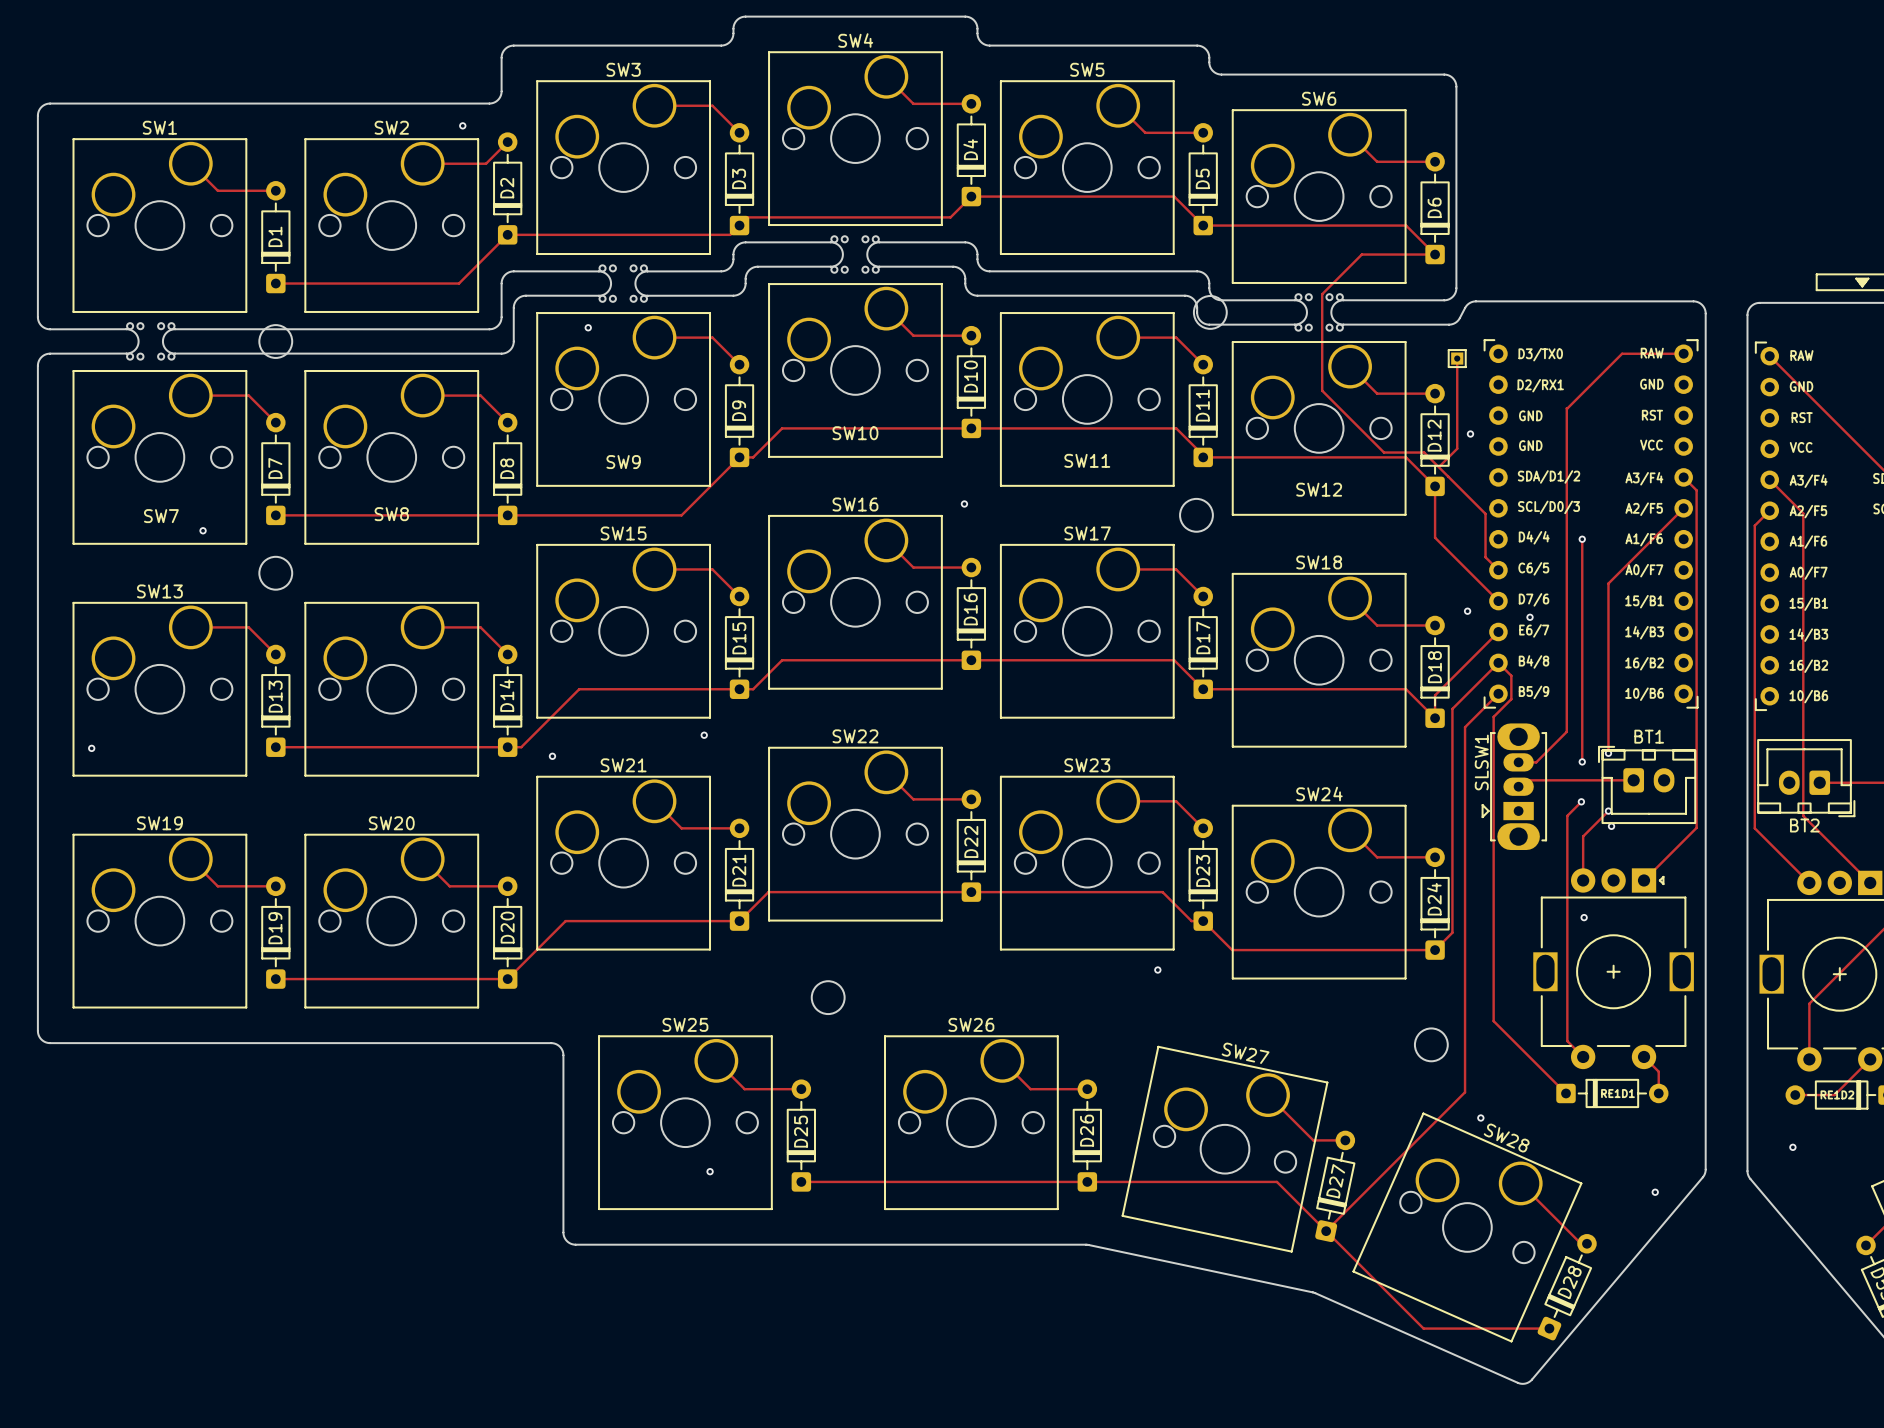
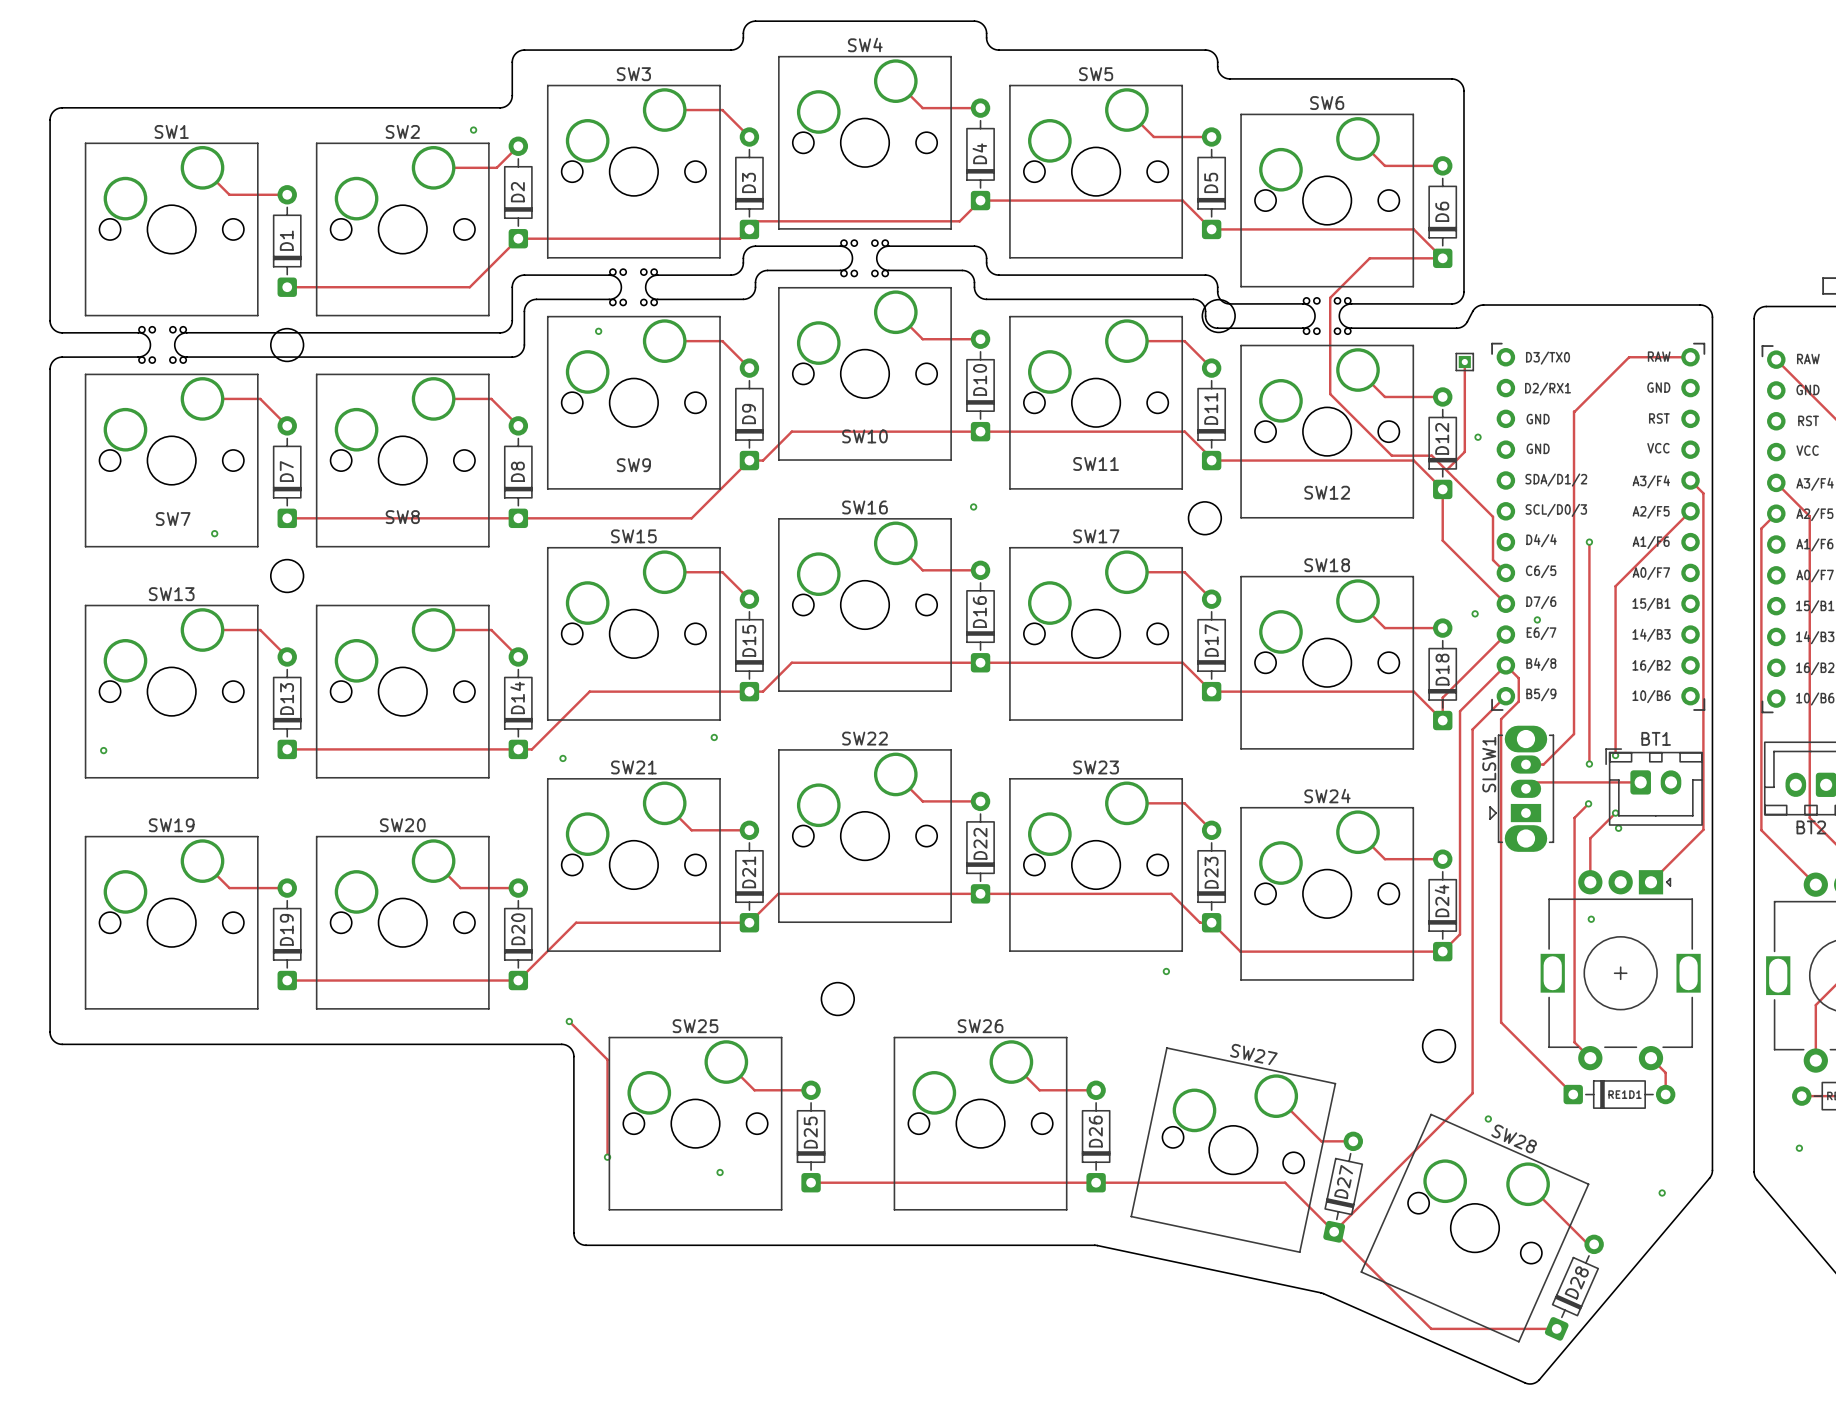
track: none -> (569, 1021) (607, 1059) (607, 1157)
via: none -> (569, 1021)
via: none -> (607, 1157)

